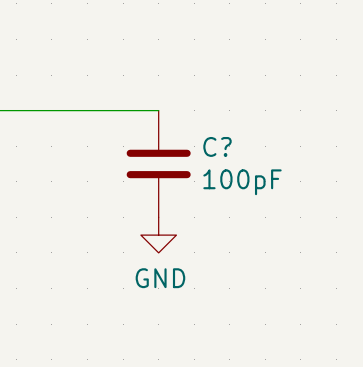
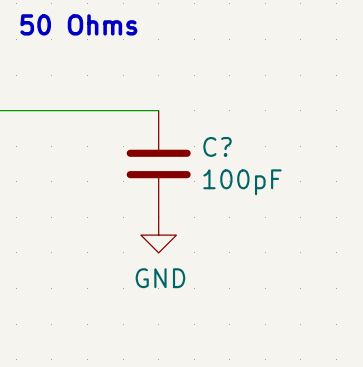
text: none -> 50 Ohms (78, 24)

